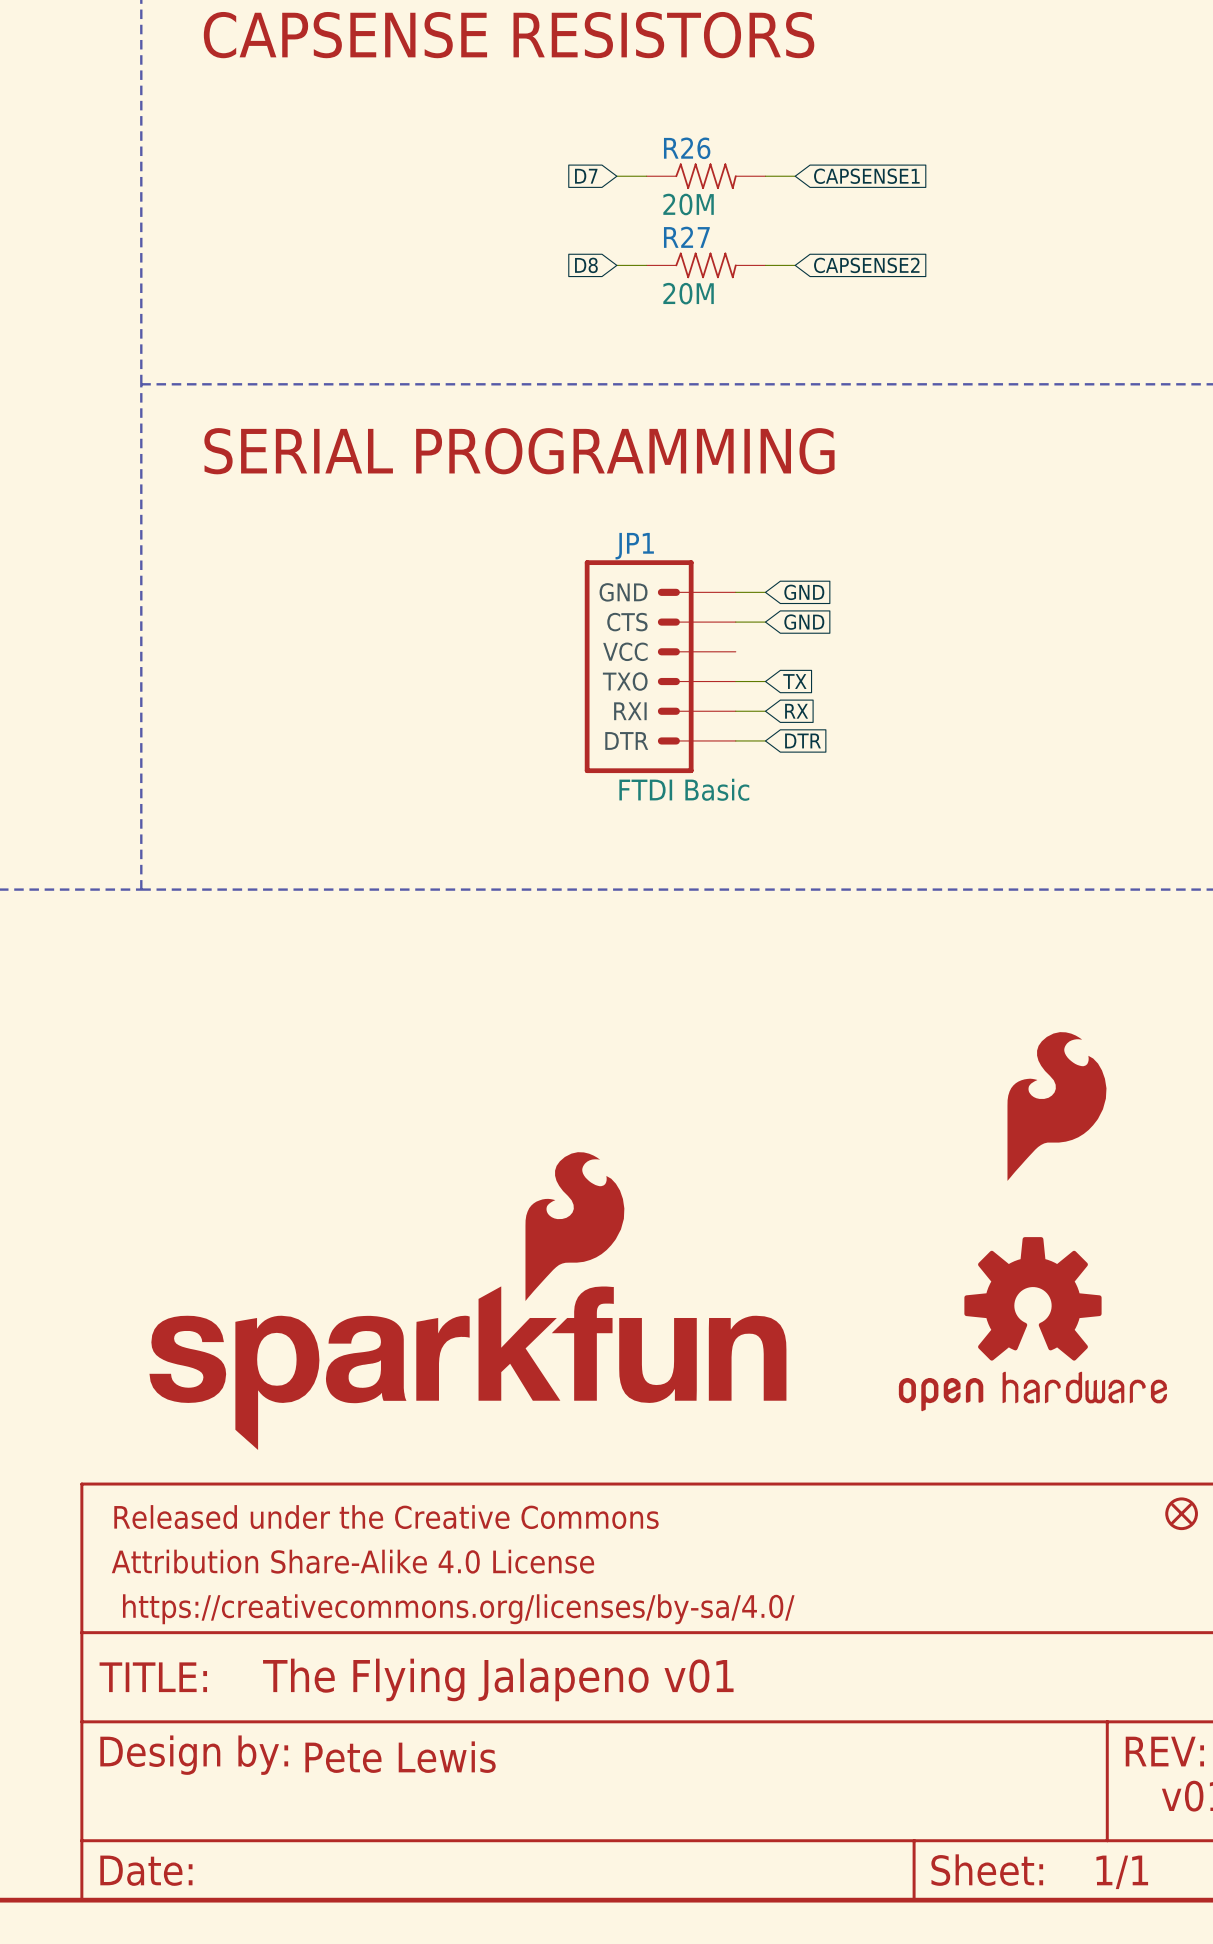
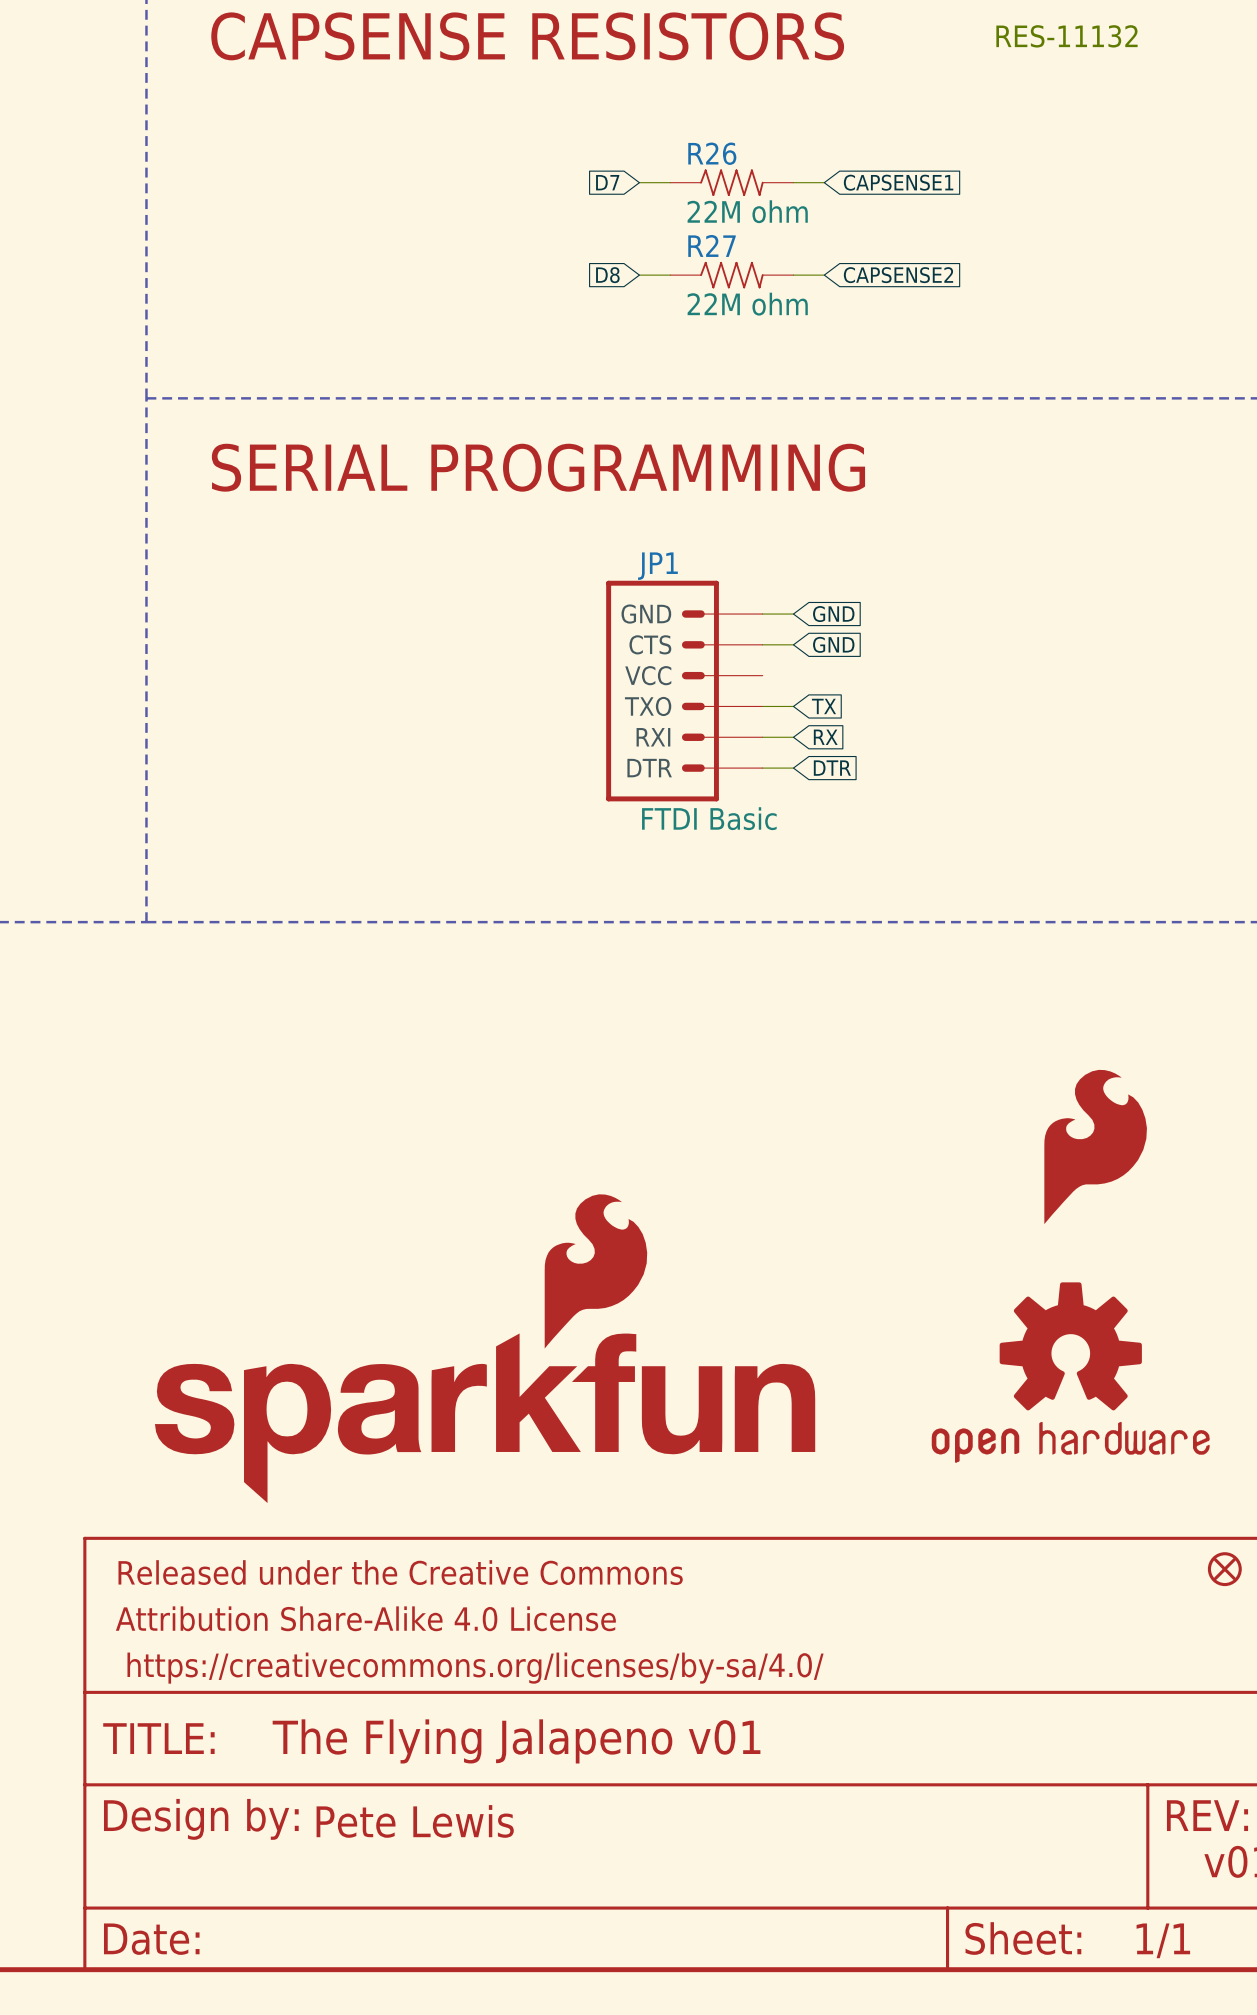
text: none -> RES-11132 (1066, 36)
R26 value: 20M (688, 204) -> 22M ohm (747, 211)
R27 value: 20M (688, 293) -> 22M ohm (747, 304)

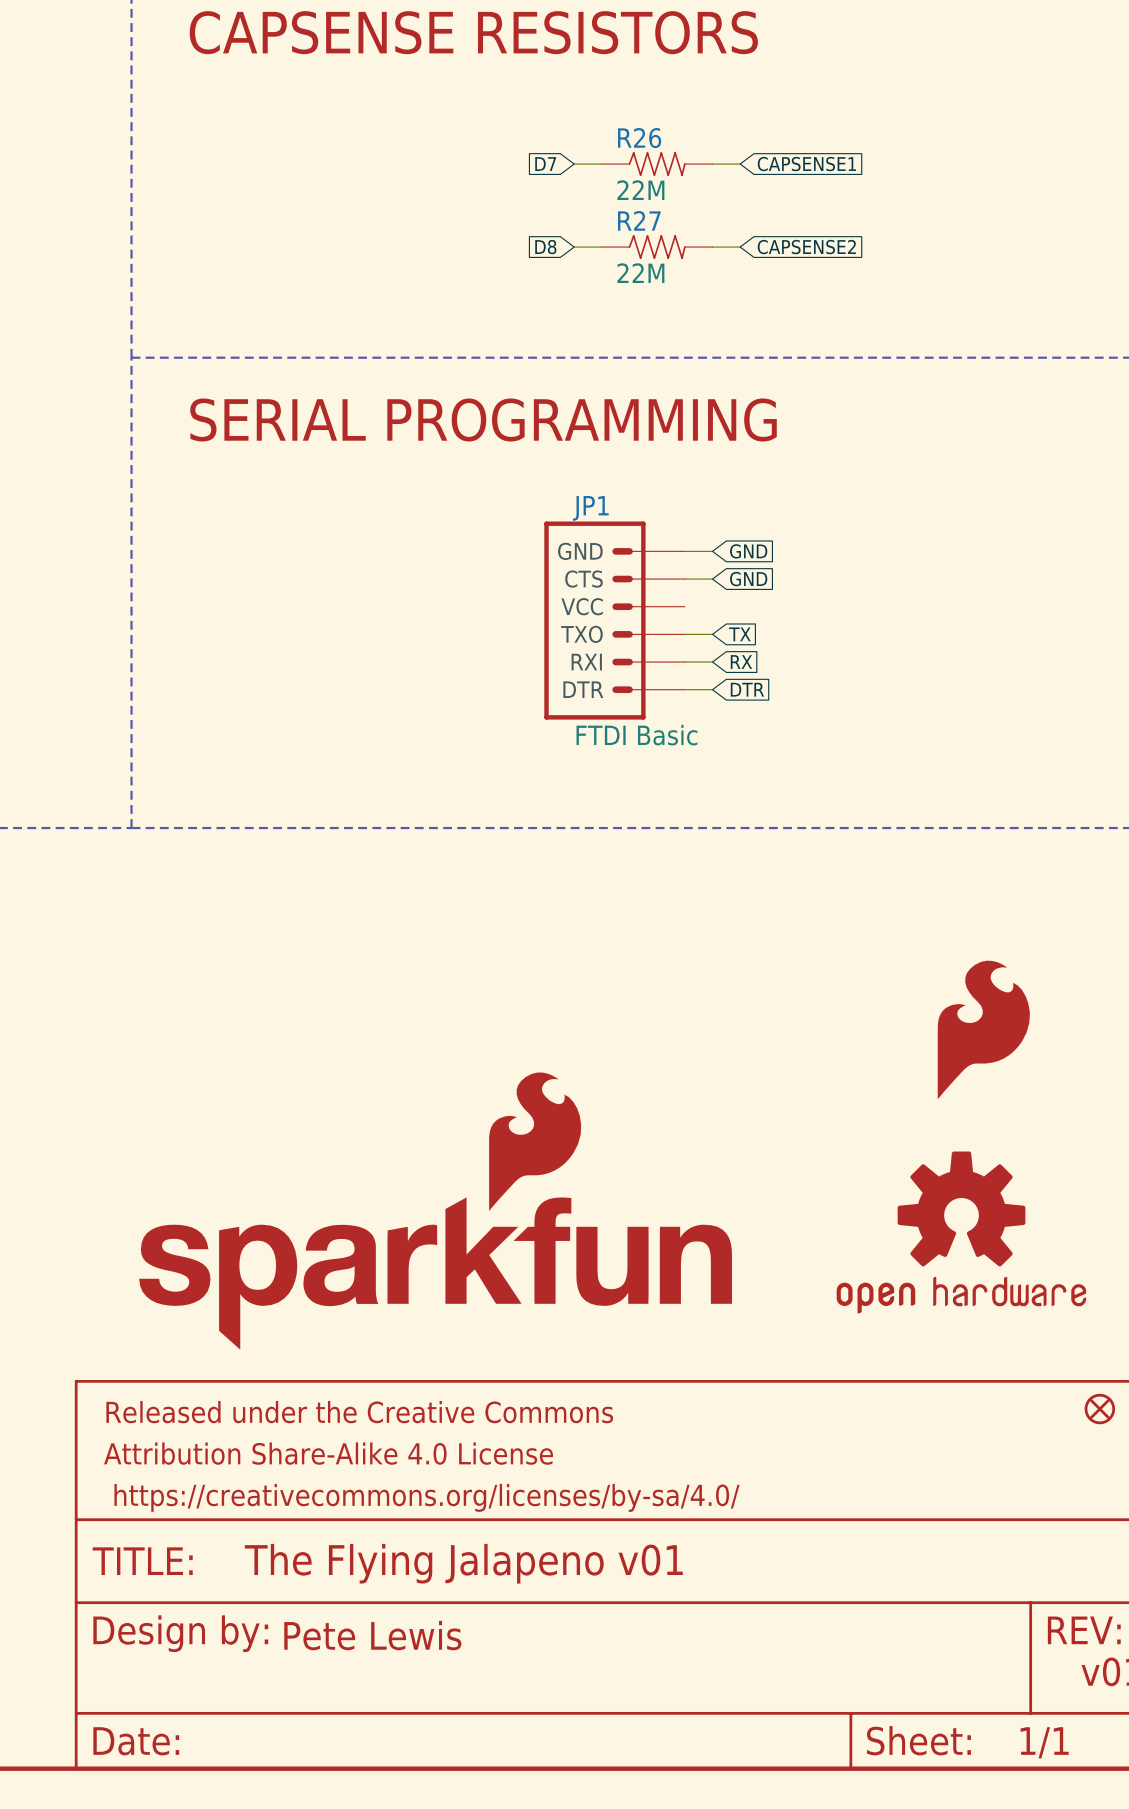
text: RES-11132 (1066, 36) -> none
R26 value: 22M ohm (747, 211) -> 22M (640, 190)
R27 value: 22M ohm (747, 304) -> 22M (640, 273)

